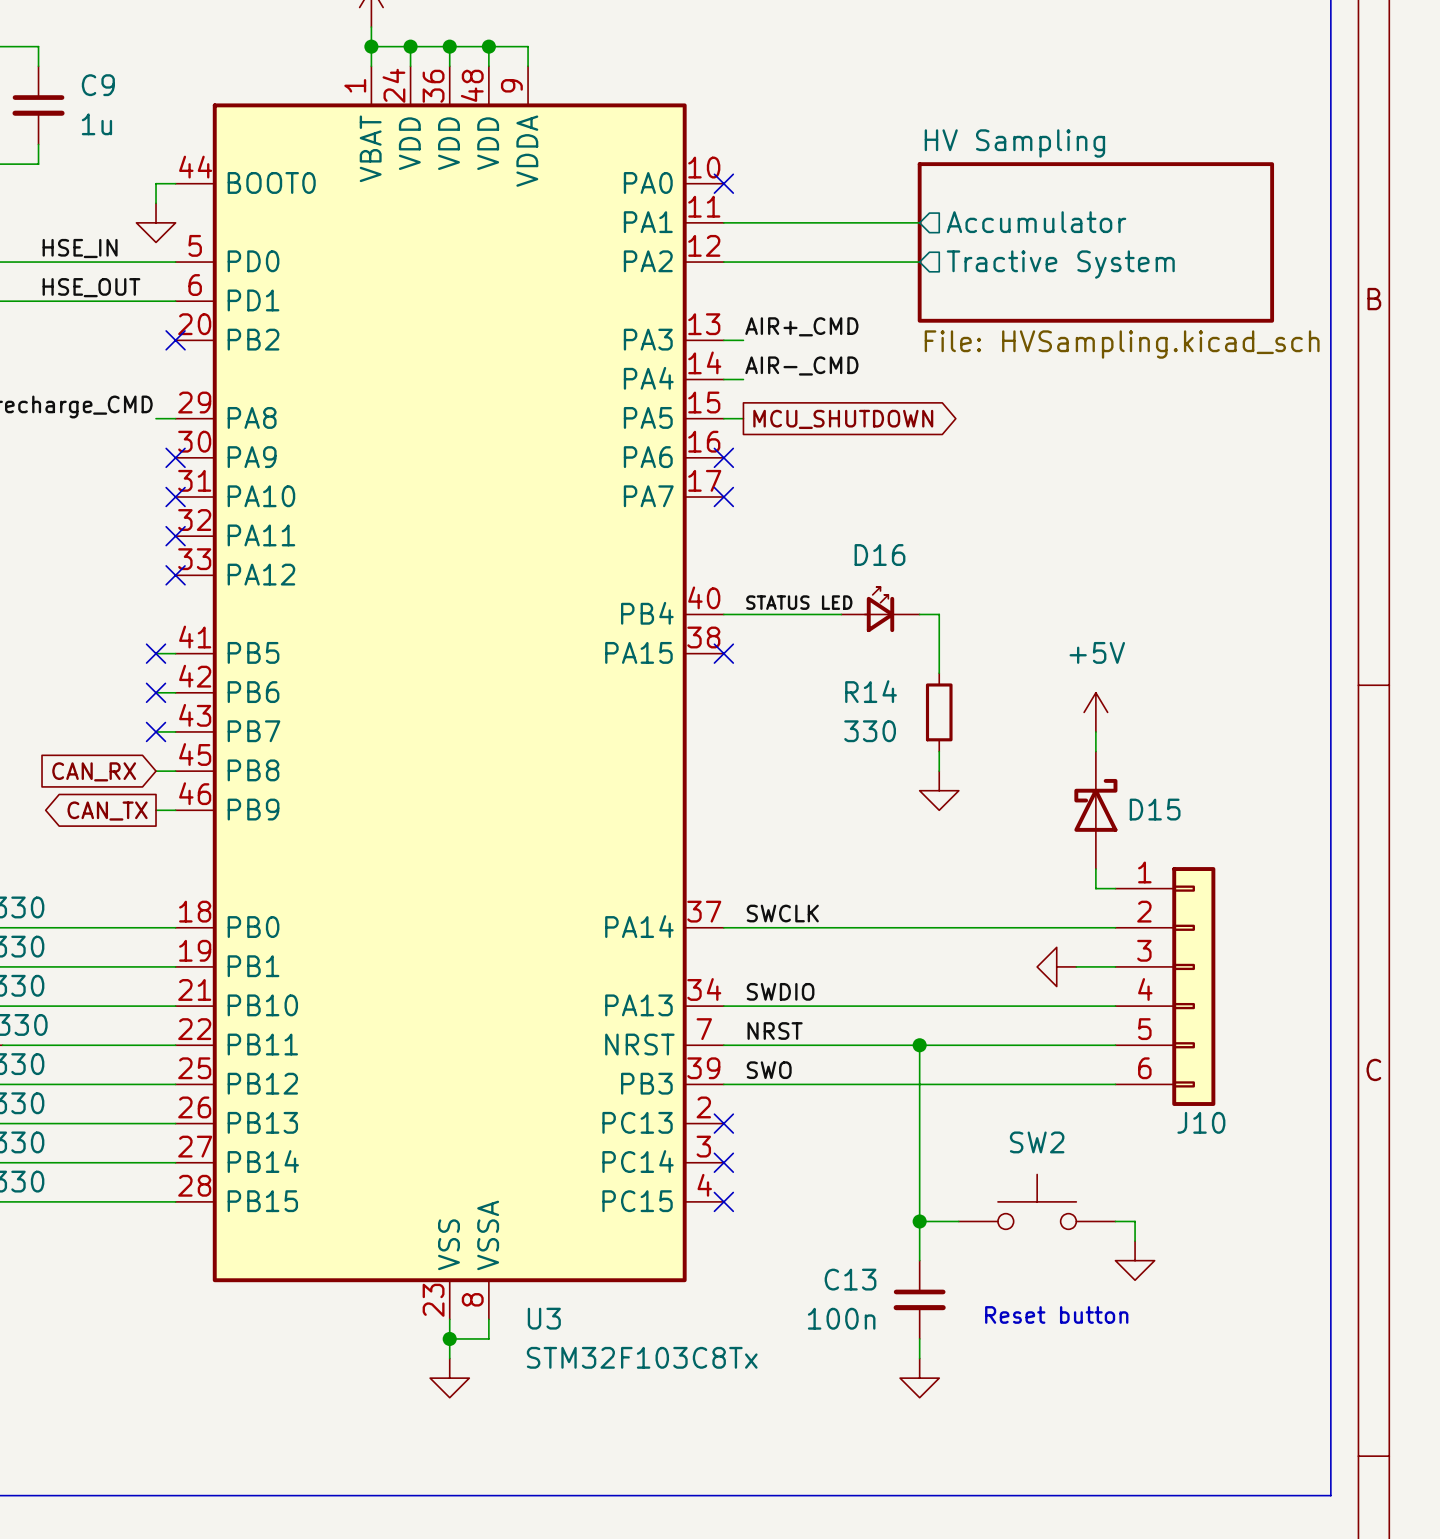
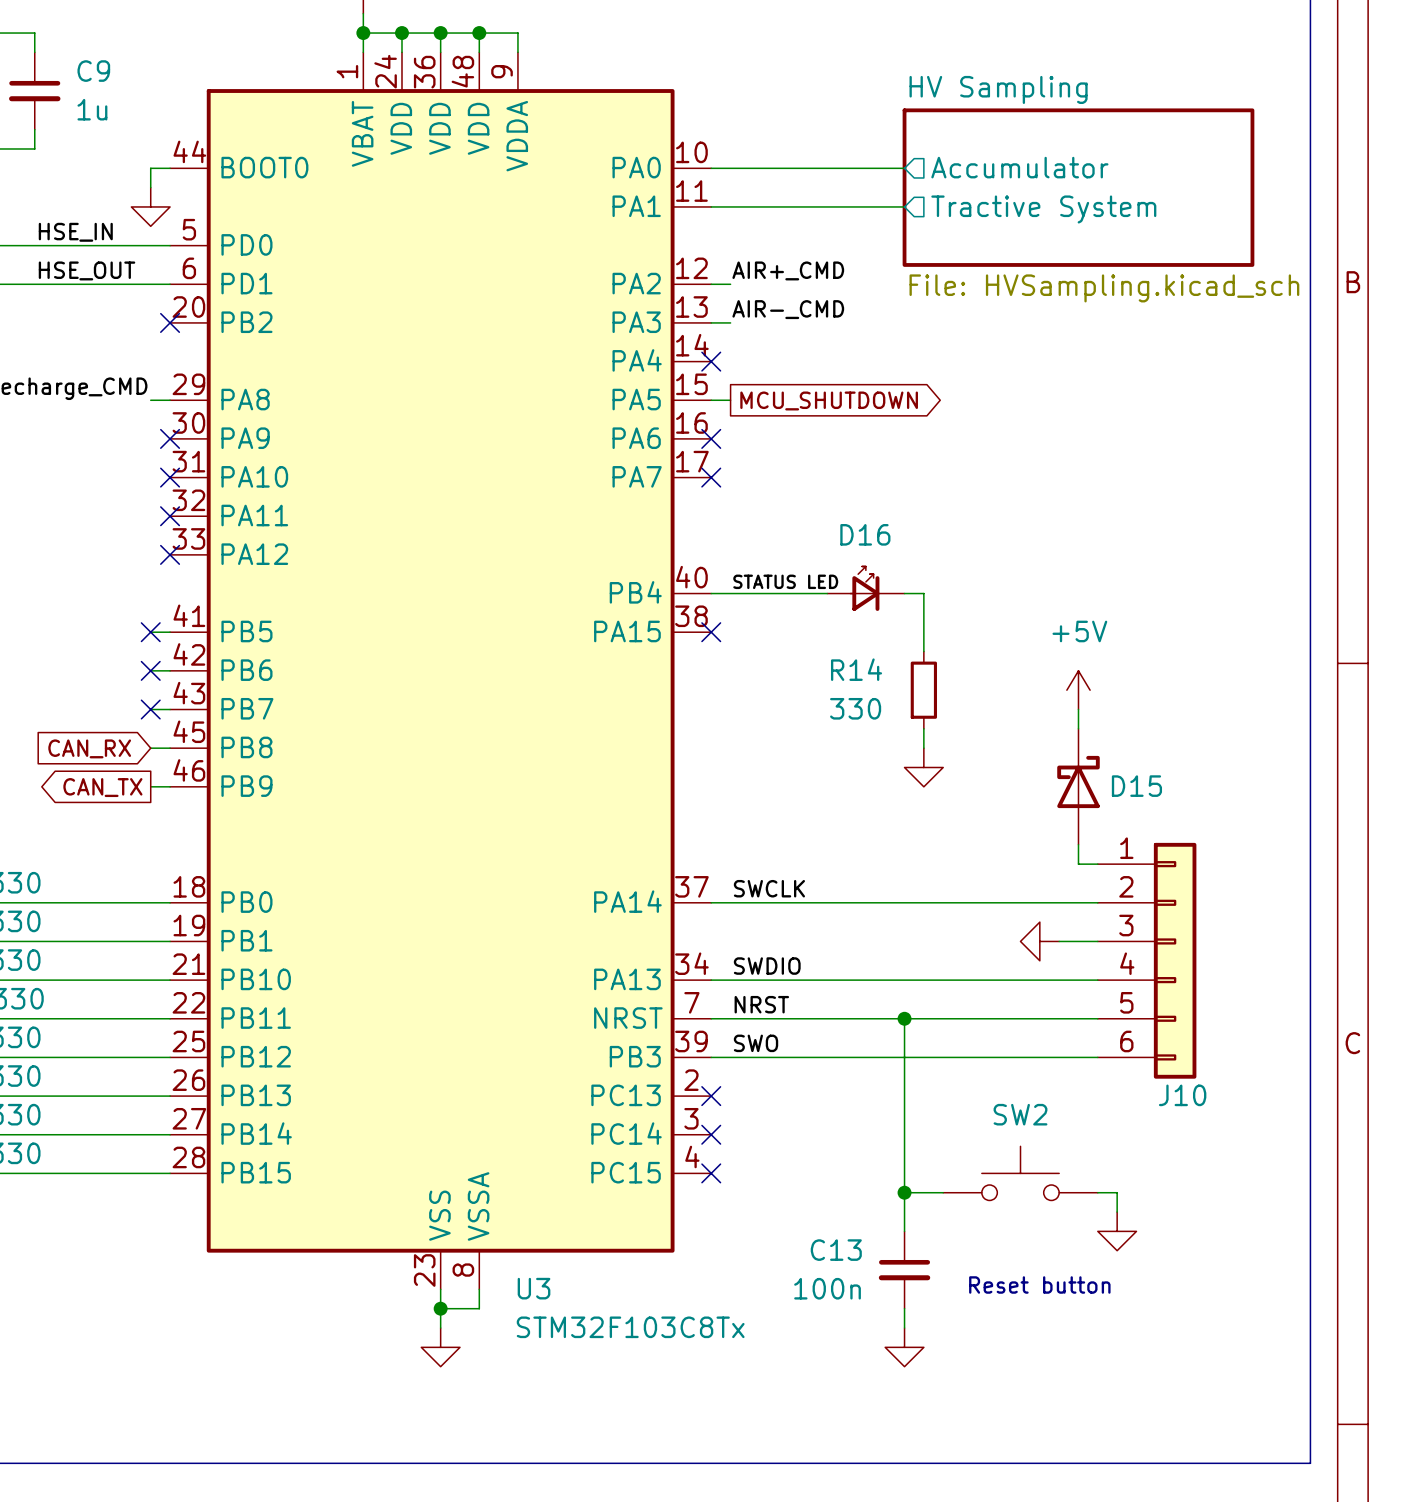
U3 symbol: [175, 66, 724, 1320] -> [170, 52, 712, 1290]
sheet pin: none -> Accumulator (1019, 167)
no-connect mark: (723, 183) -> none
sheet pin: Accumulator (1036, 222) -> Tractive System (1043, 209)
sheet HV Sampling position: (1095, 242) -> (1078, 187)
wire: (723, 262) (919, 262) -> (711, 168) (904, 168)
sheet pin: Tractive System (1060, 264) -> none
label: none -> AIR+_CMD (788, 270)
label: AIR+_CMD (801, 326) -> AIR-_CMD (788, 309)
label: AIR-_CMD (801, 365) -> none
wire: (723, 379) (743, 379) -> (711, 284) (730, 284)
no-connect mark: none -> (711, 361)

